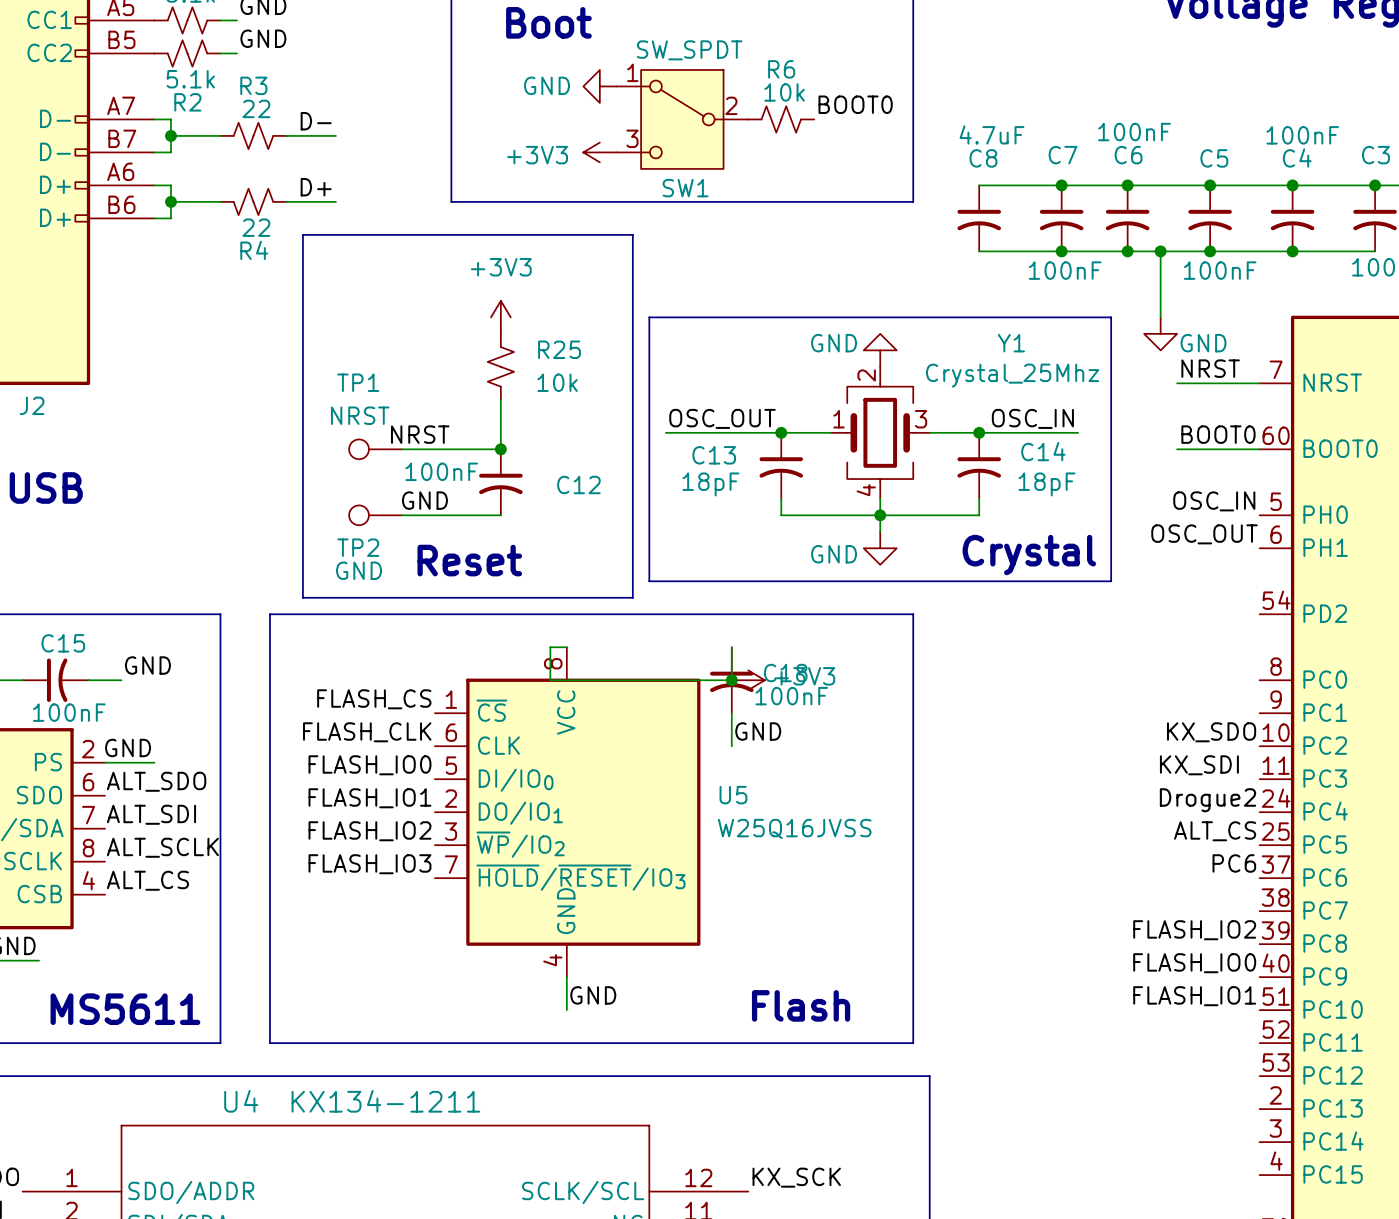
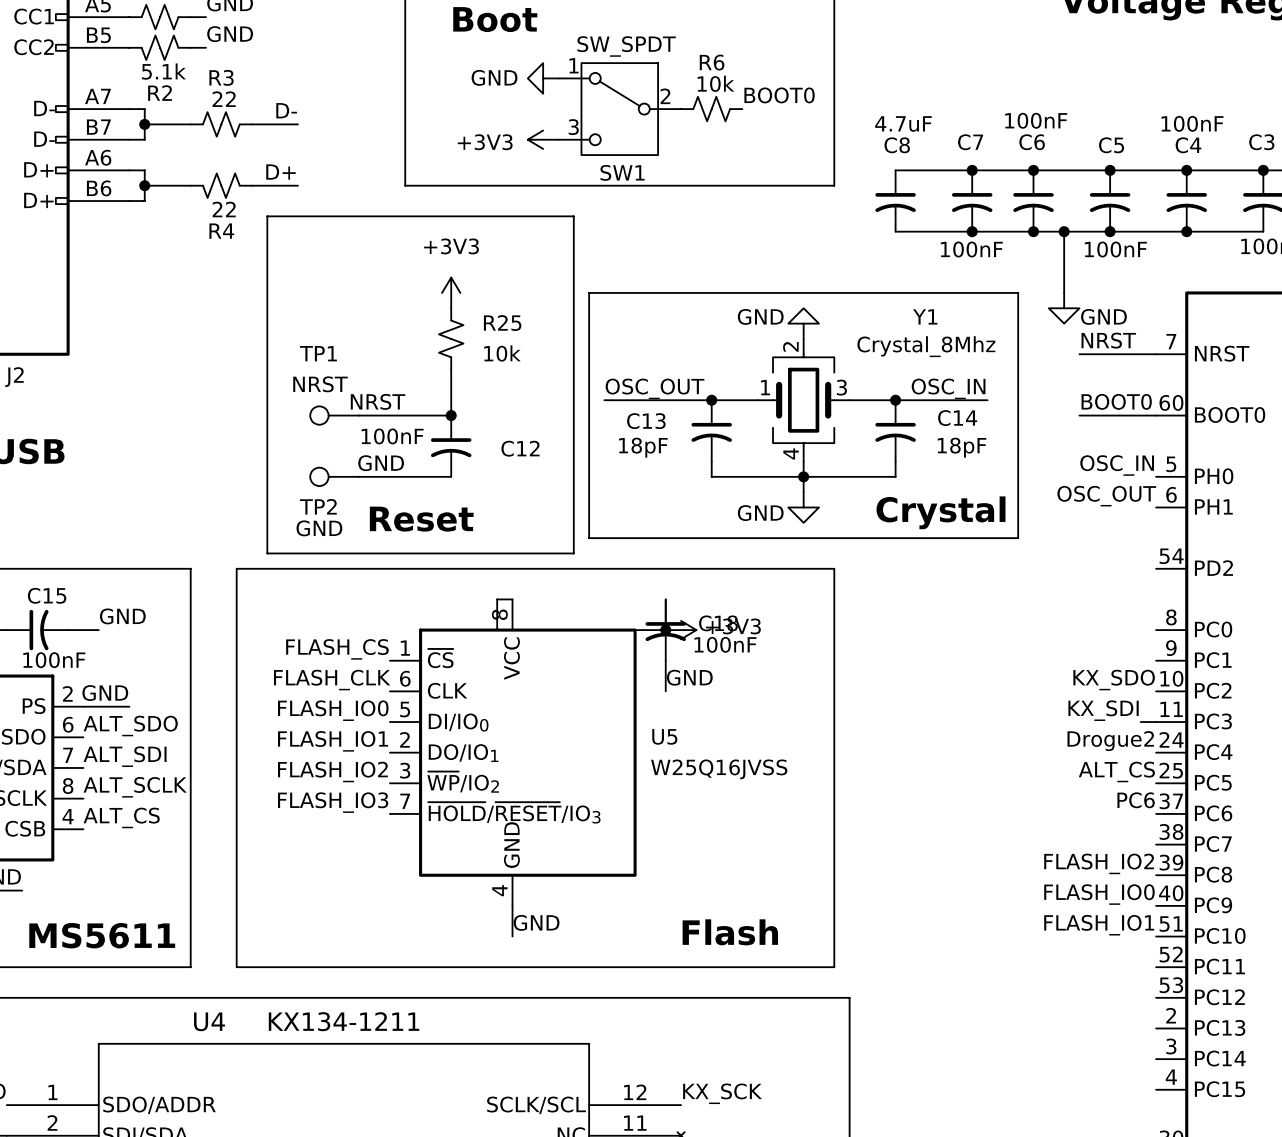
Y1 value: Crystal_25Mhz (1012, 375) -> Crystal_8Mhz (926, 346)
wire: none -> (1140, 722) (1156, 722)

